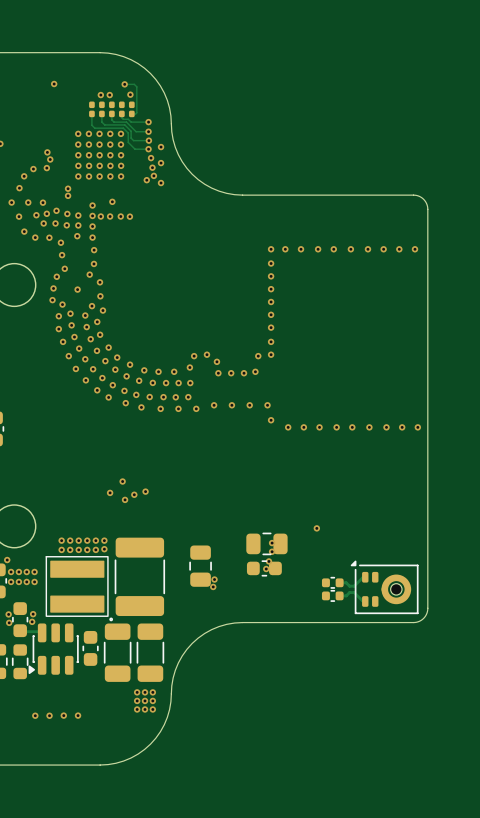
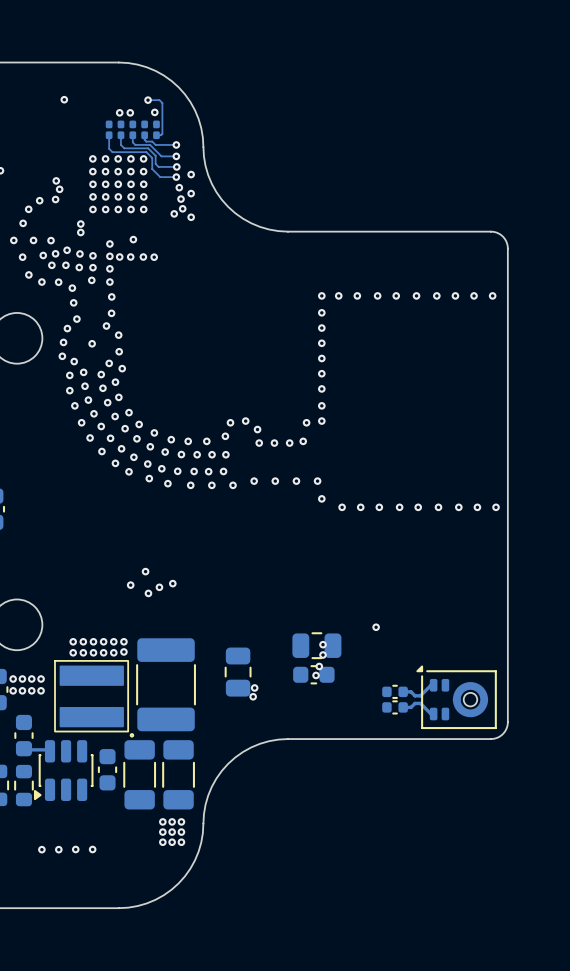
via: (7, 560) -> none
via: (8, 614) -> none
via: (33, 614) -> none
via: (32, 621) -> none
via: (9, 622) -> none

